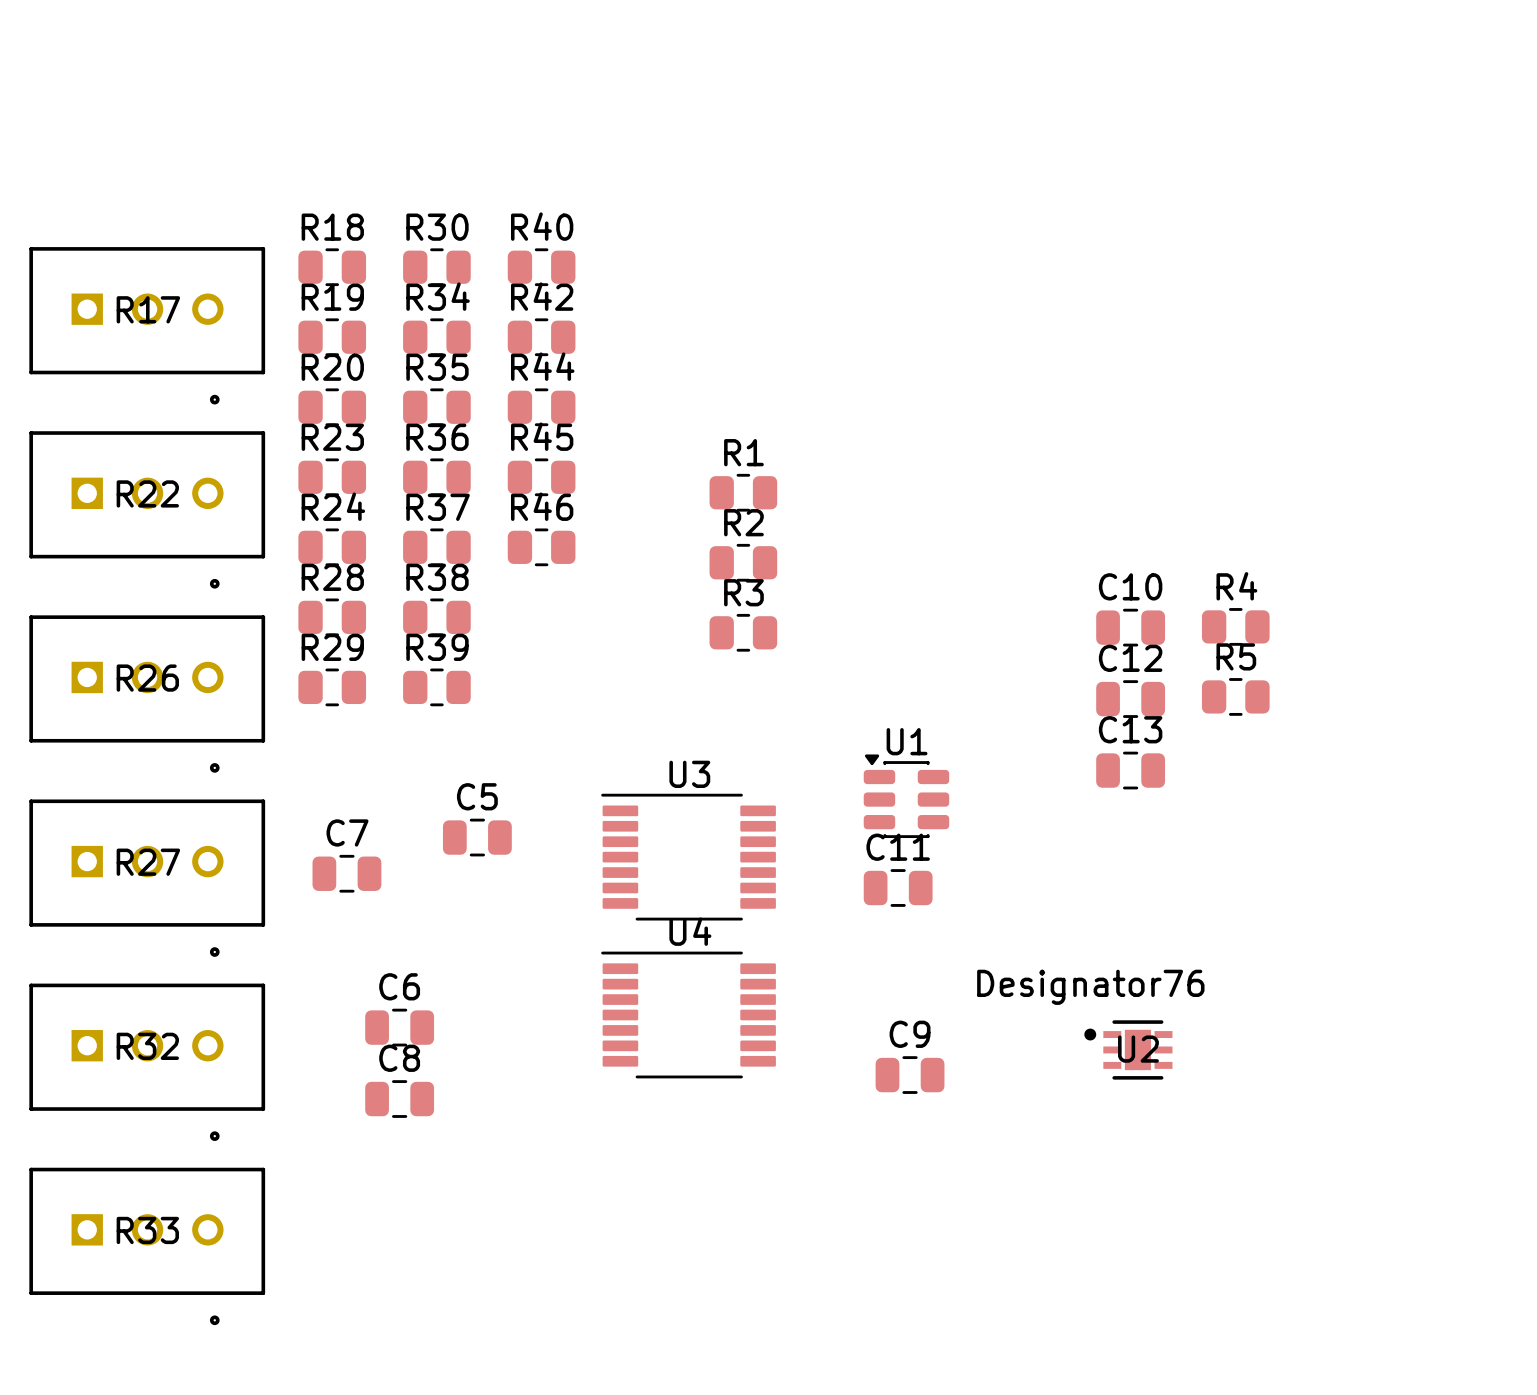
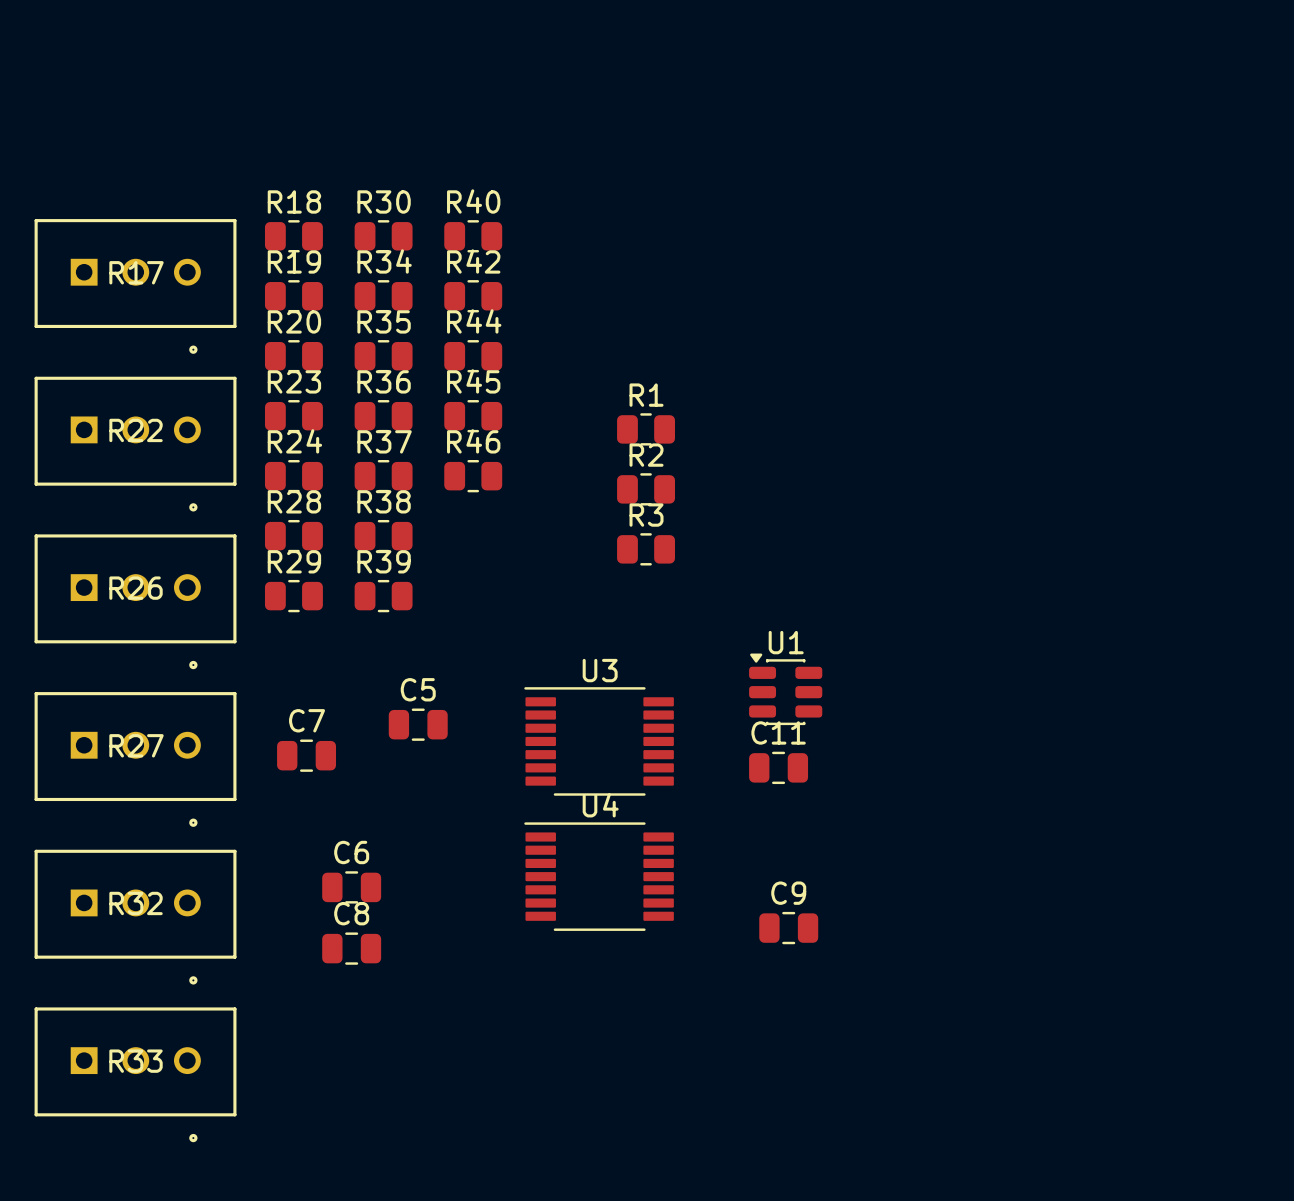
R4: (1235, 626) -> none
C10: (1130, 627) -> none
R5: (1235, 696) -> none
C12: (1130, 699) -> none
C13: (1130, 770) -> none
U2: (1128, 1049) -> none

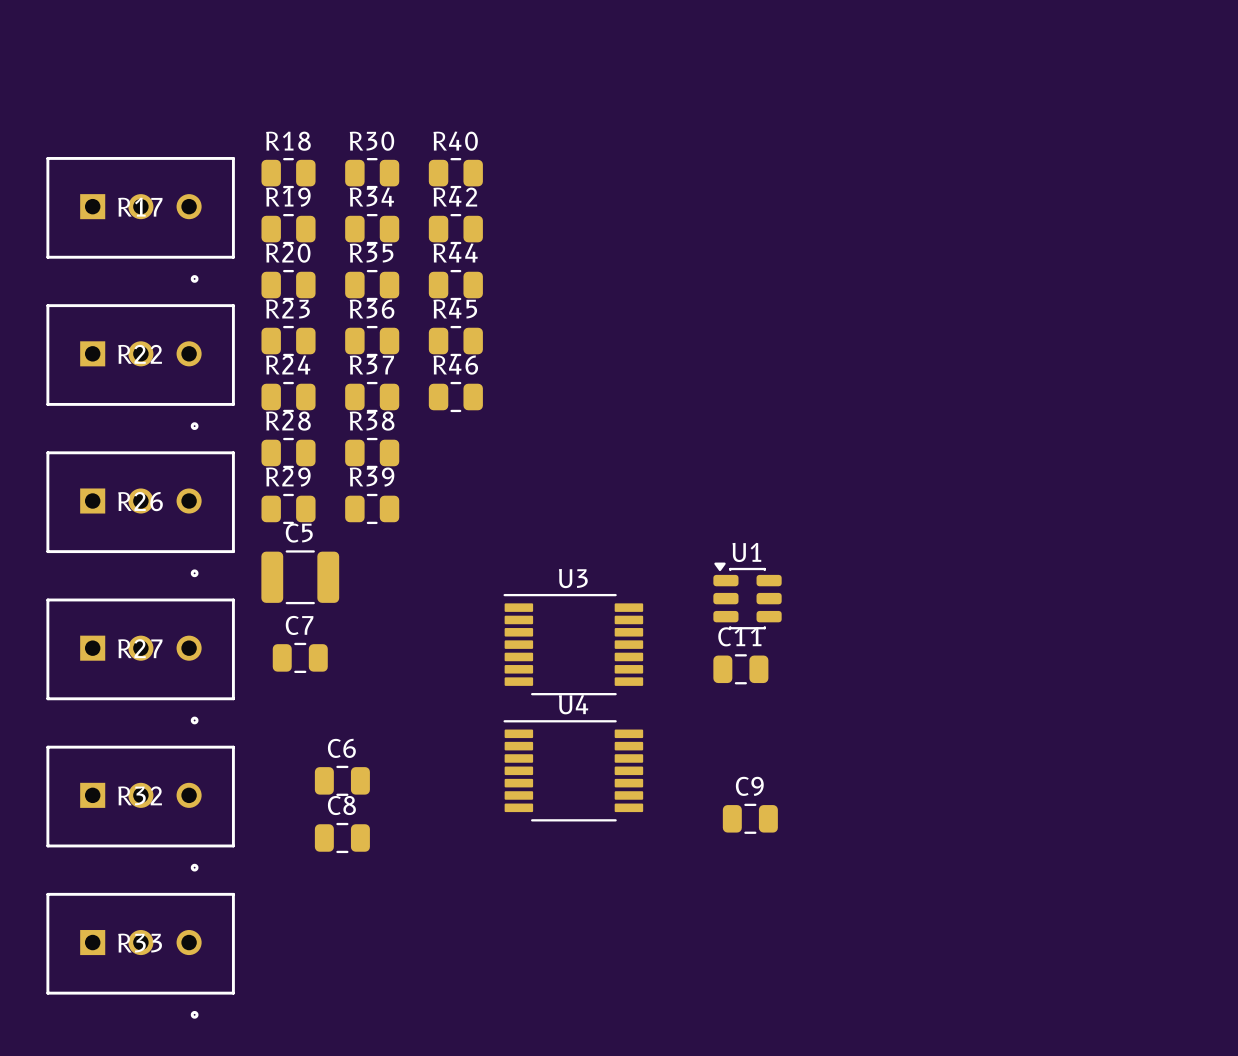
R1: (646, 429) -> none
R2: (646, 489) -> none
R3: (646, 549) -> none
C5 footprint: [388, 708, 448, 741] -> [261, 550, 340, 605]

